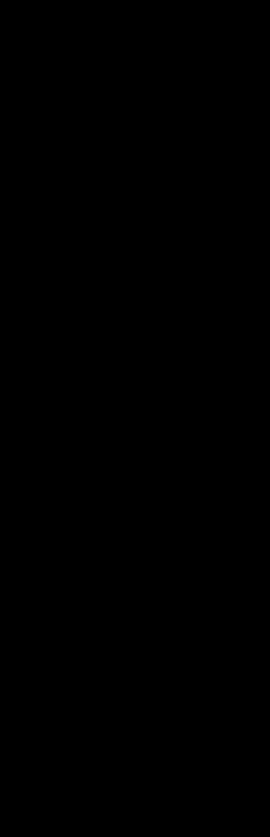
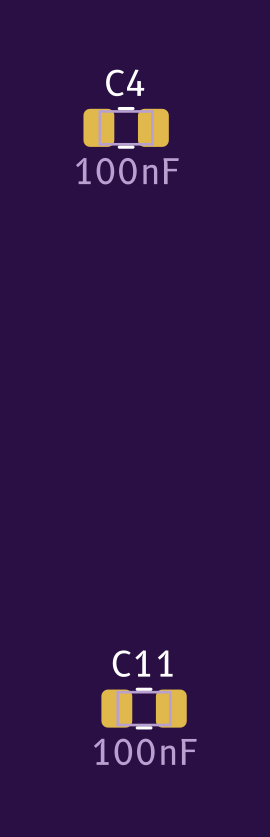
C4: none -> 100nF (126, 127)
C11: none -> 100nF (144, 708)

